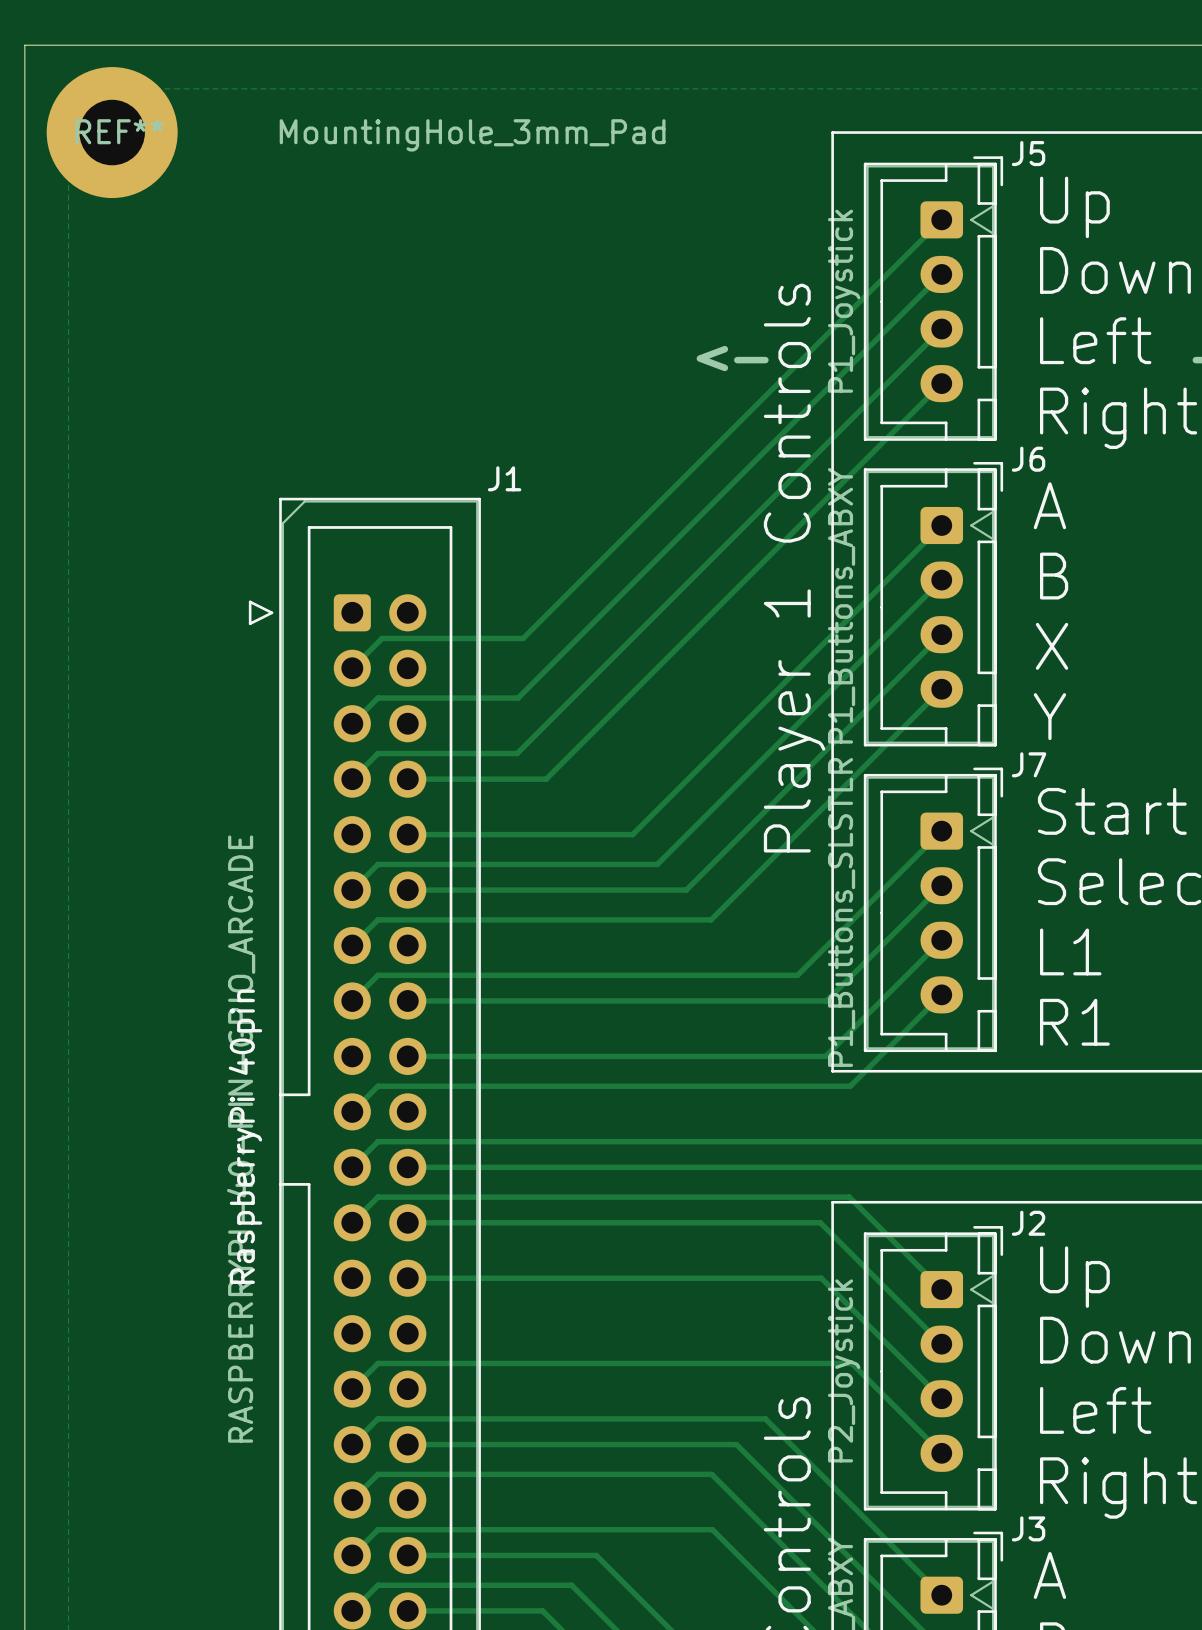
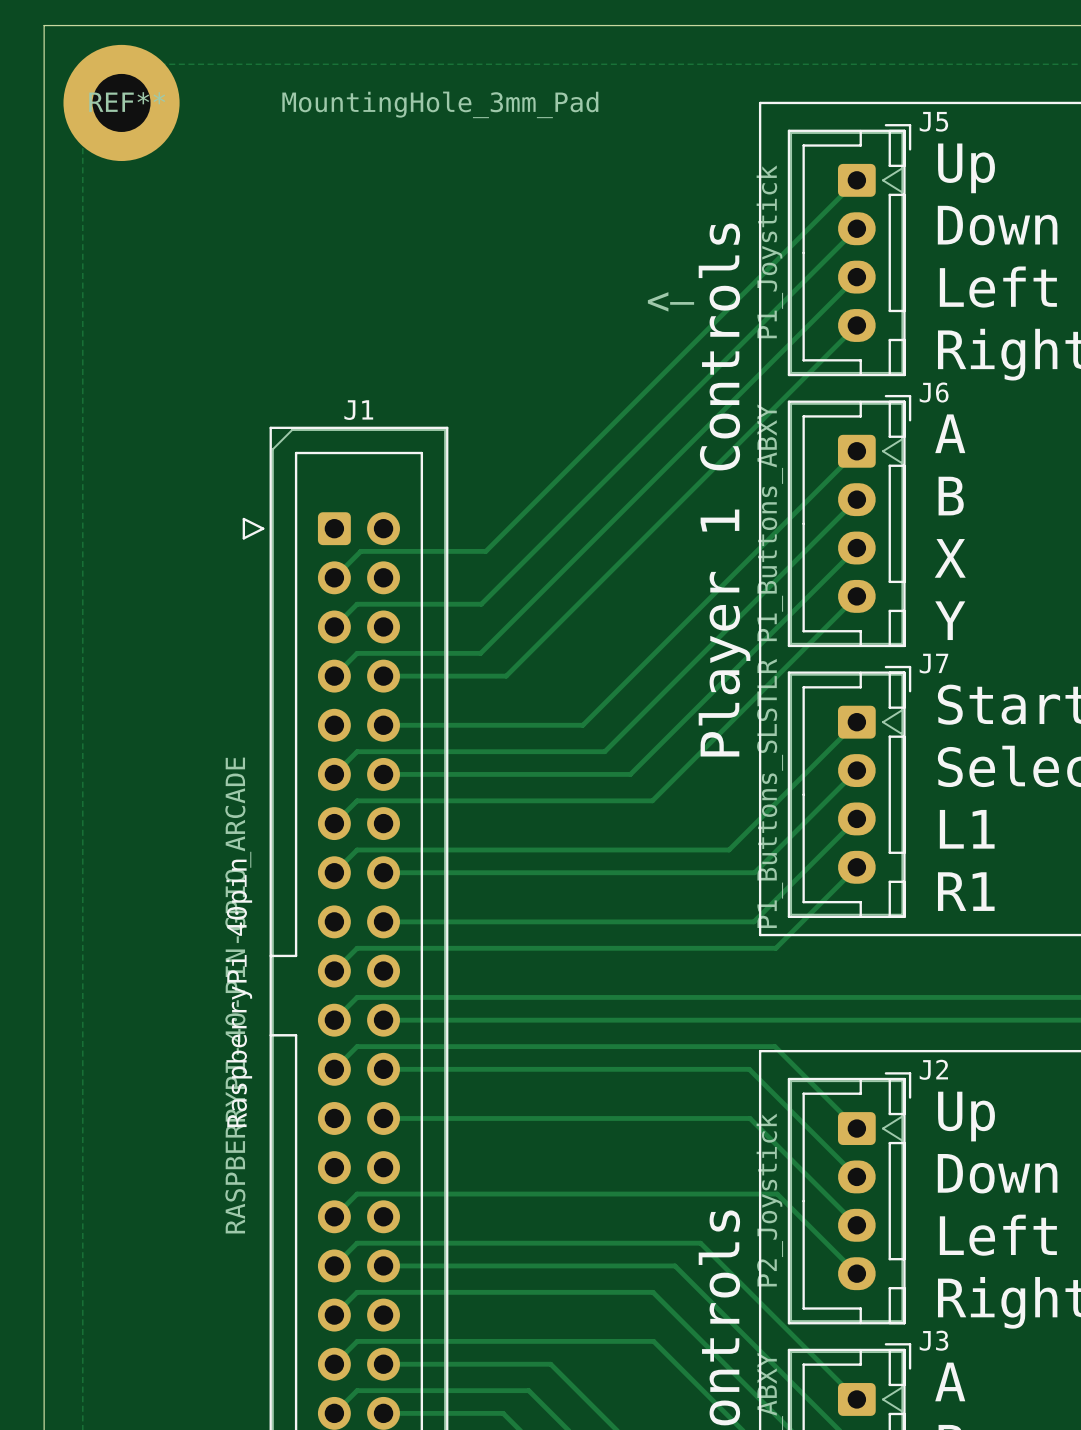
J1 name position: J1 (504, 478) -> J1 (358, 410)

